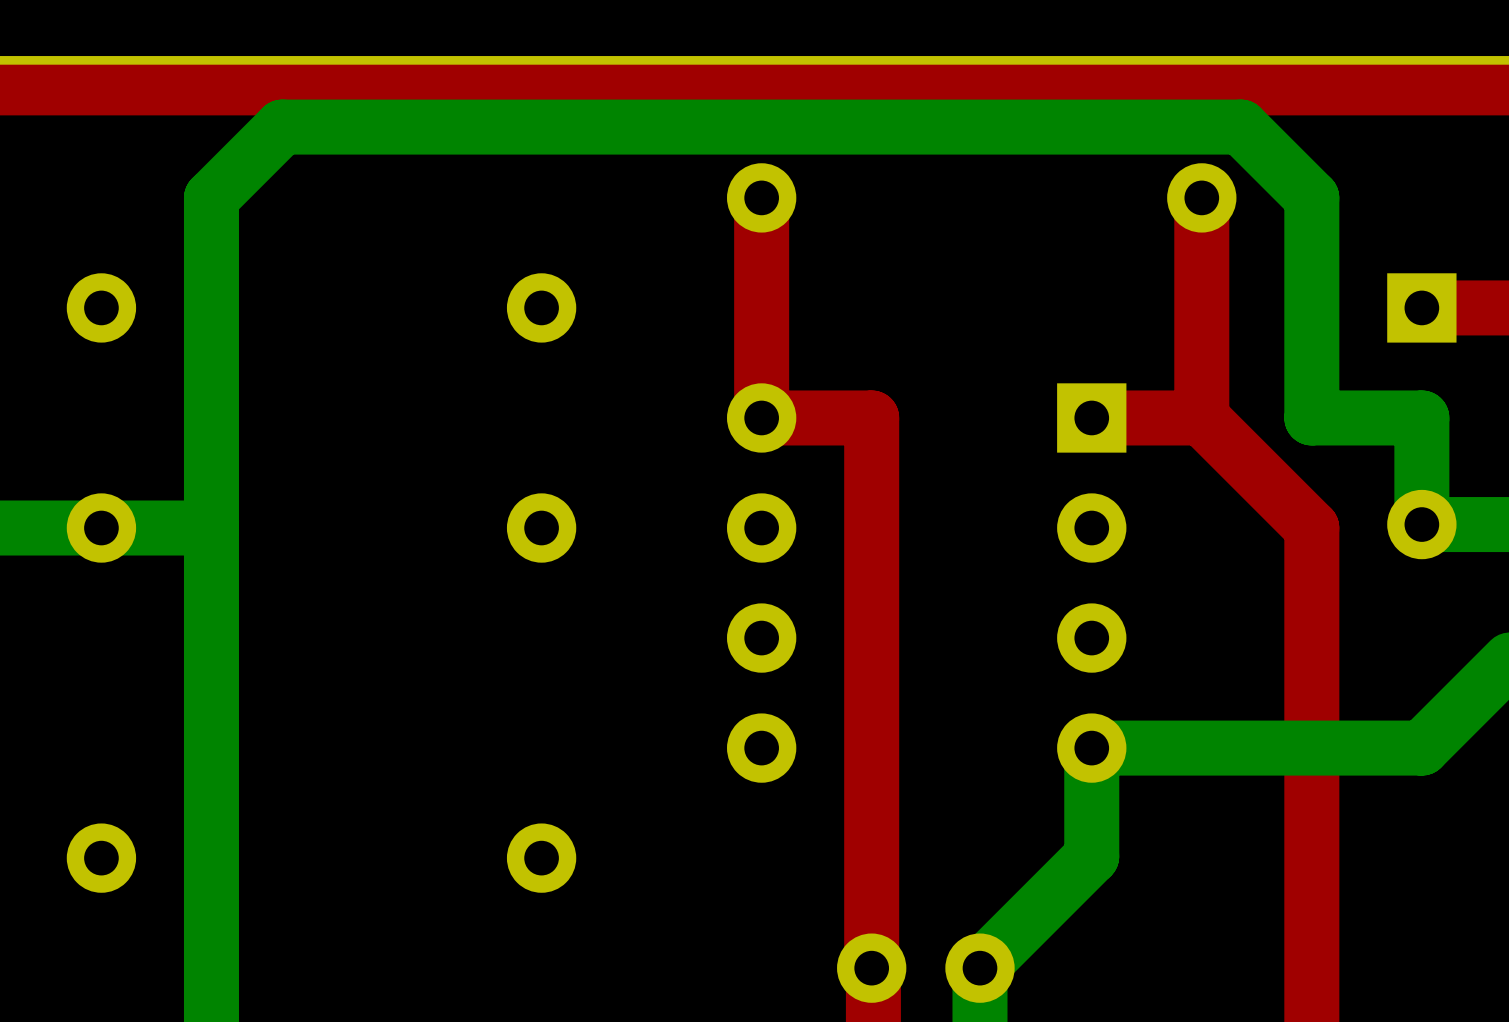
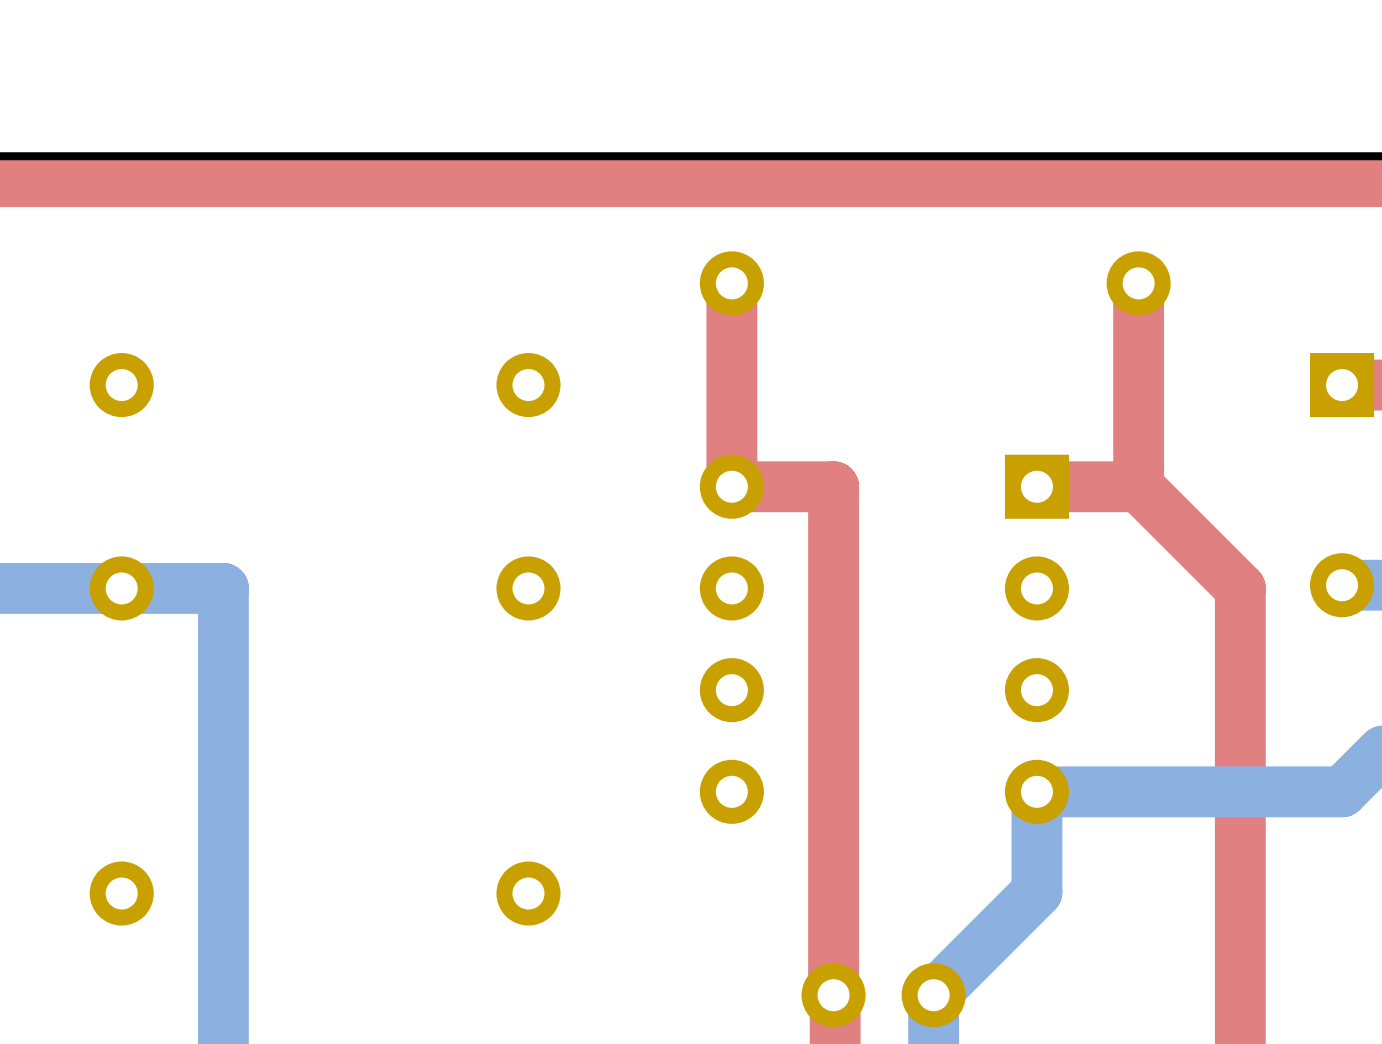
bottom track: (1421, 524) (1421, 417) (1311, 417) (1311, 197) (1241, 127) (282, 127) (211, 197) (211, 528) -> none

